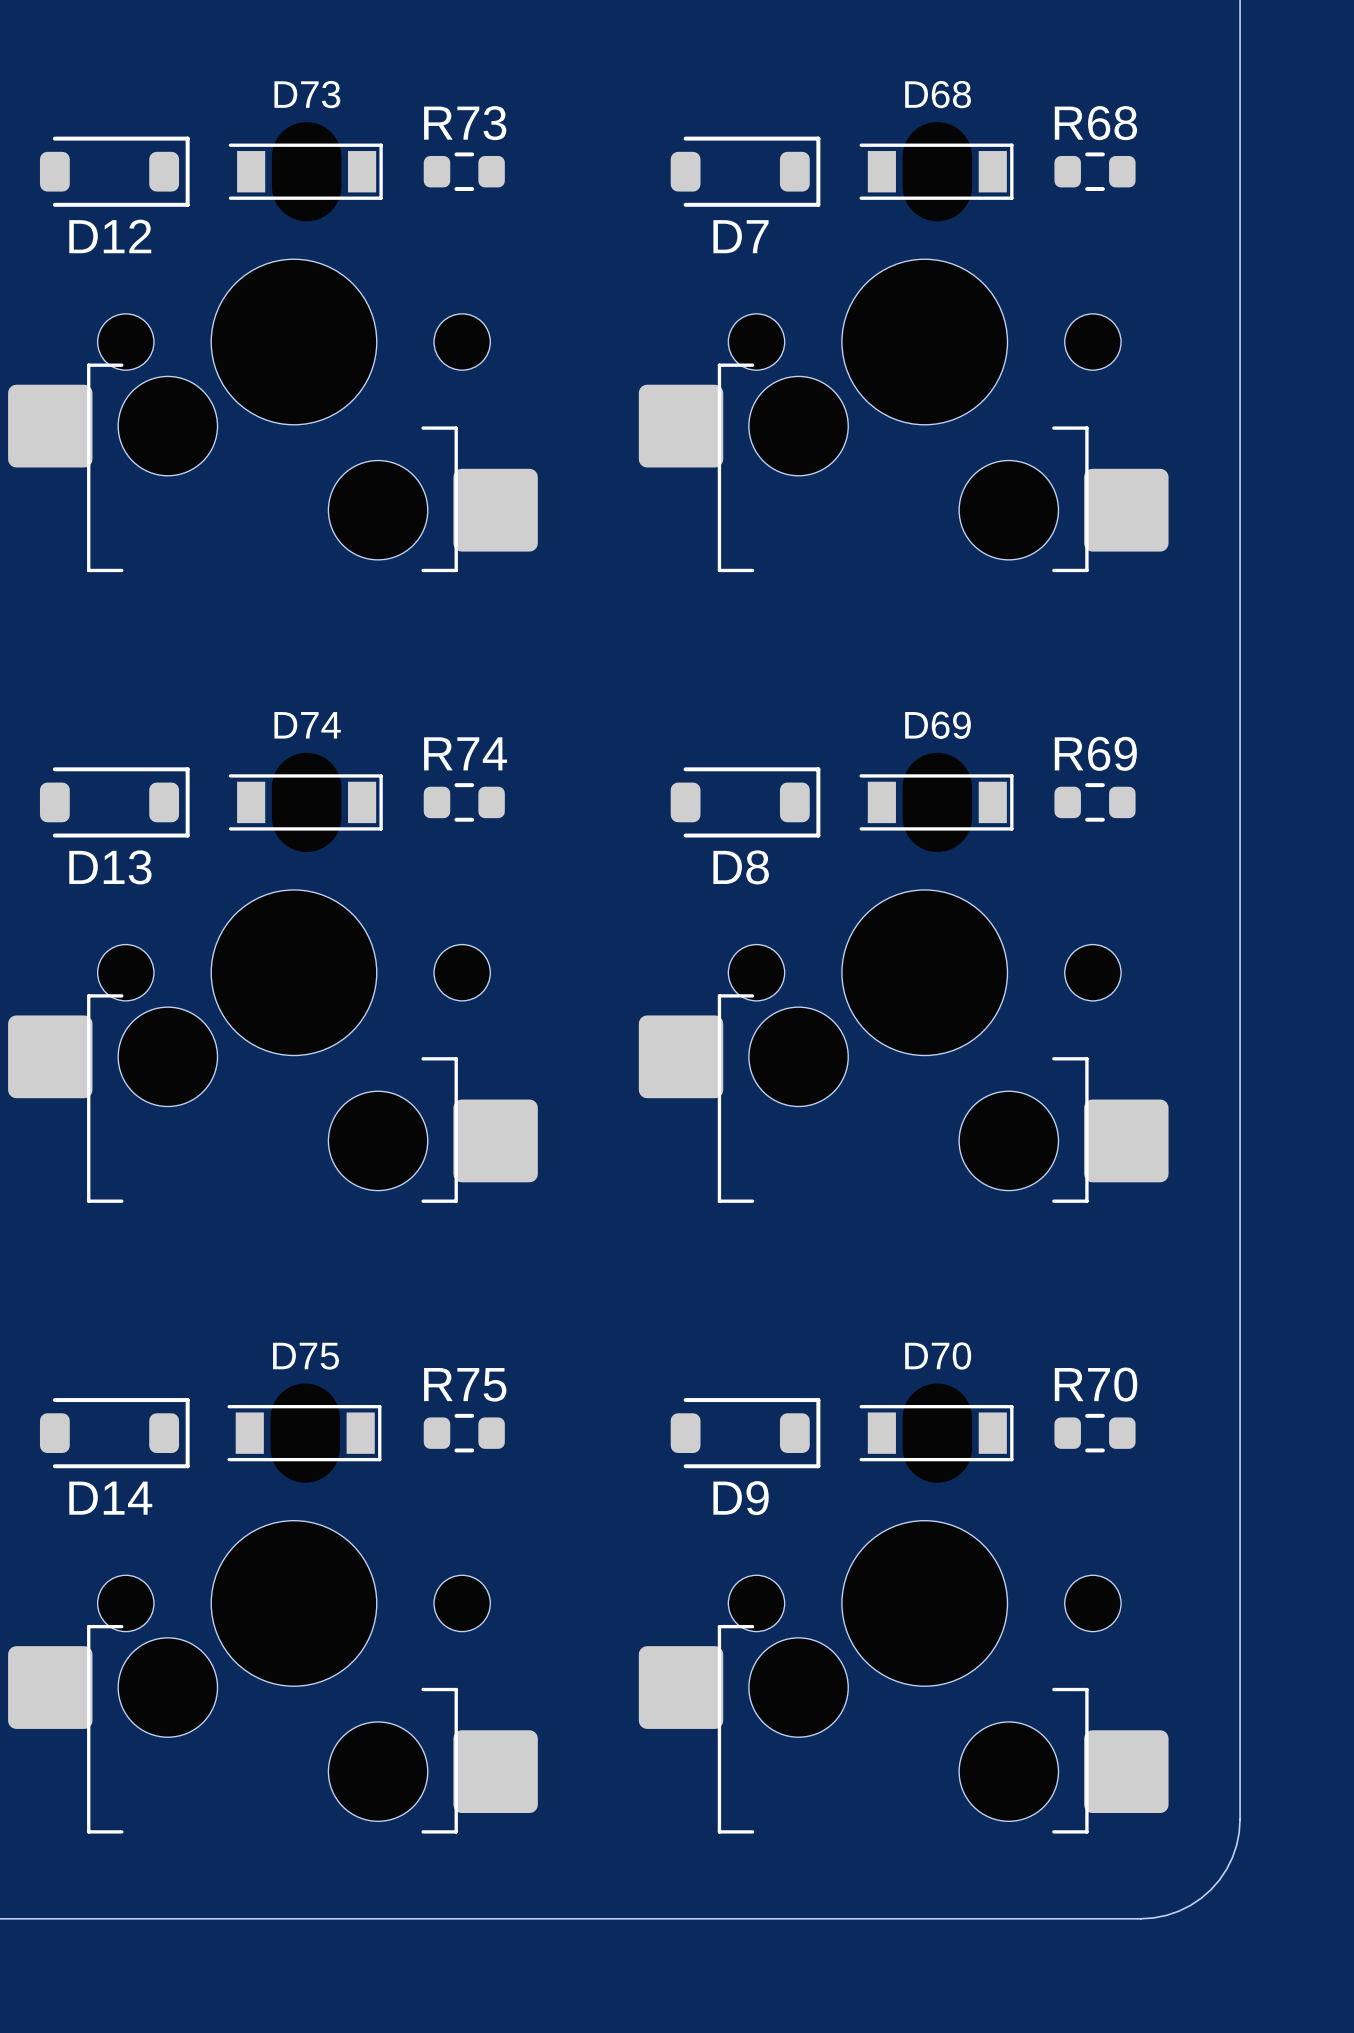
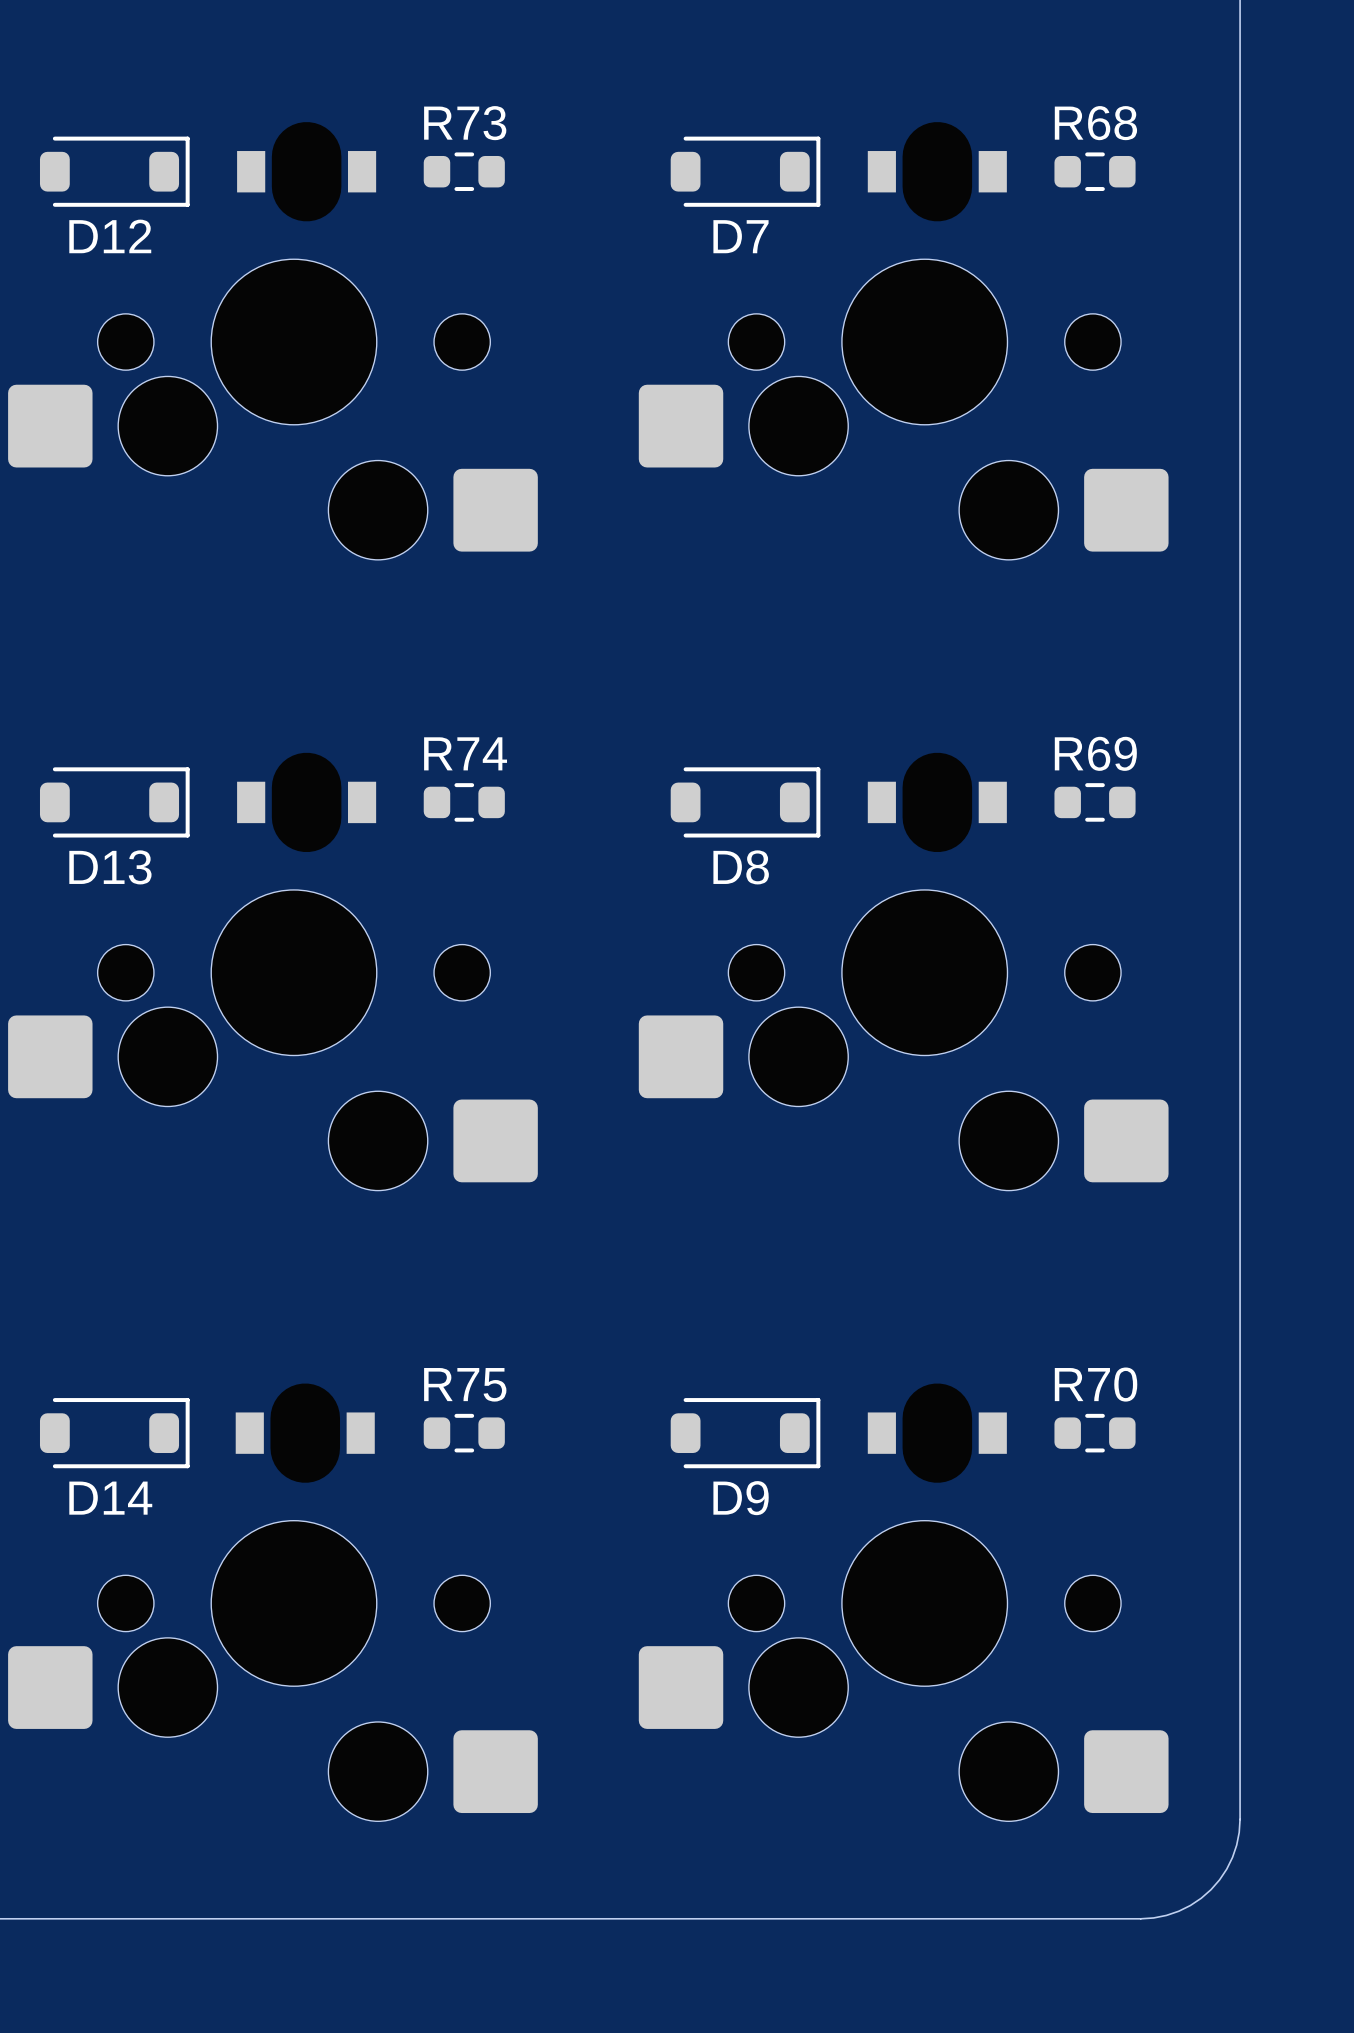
D73: (305, 171) -> none
part: none -> (306, 171)
D68: (936, 171) -> none
part: none -> (937, 171)
part footprint: [8, 259, 538, 573] -> [8, 259, 538, 560]
part footprint: [638, 259, 1169, 573] -> [638, 259, 1169, 560]
D74: (305, 802) -> none
part: none -> (306, 802)
D69: (936, 802) -> none
part: none -> (937, 802)
part footprint: [8, 889, 538, 1203] -> [8, 889, 538, 1191]
part footprint: [638, 889, 1169, 1203] -> [638, 889, 1169, 1191]
D75: (304, 1433) -> none
part: none -> (305, 1433)
D70: (936, 1433) -> none
part: none -> (937, 1433)
part footprint: [8, 1520, 538, 1834] -> [8, 1520, 538, 1822]
part footprint: [638, 1520, 1169, 1834] -> [638, 1520, 1169, 1822]

